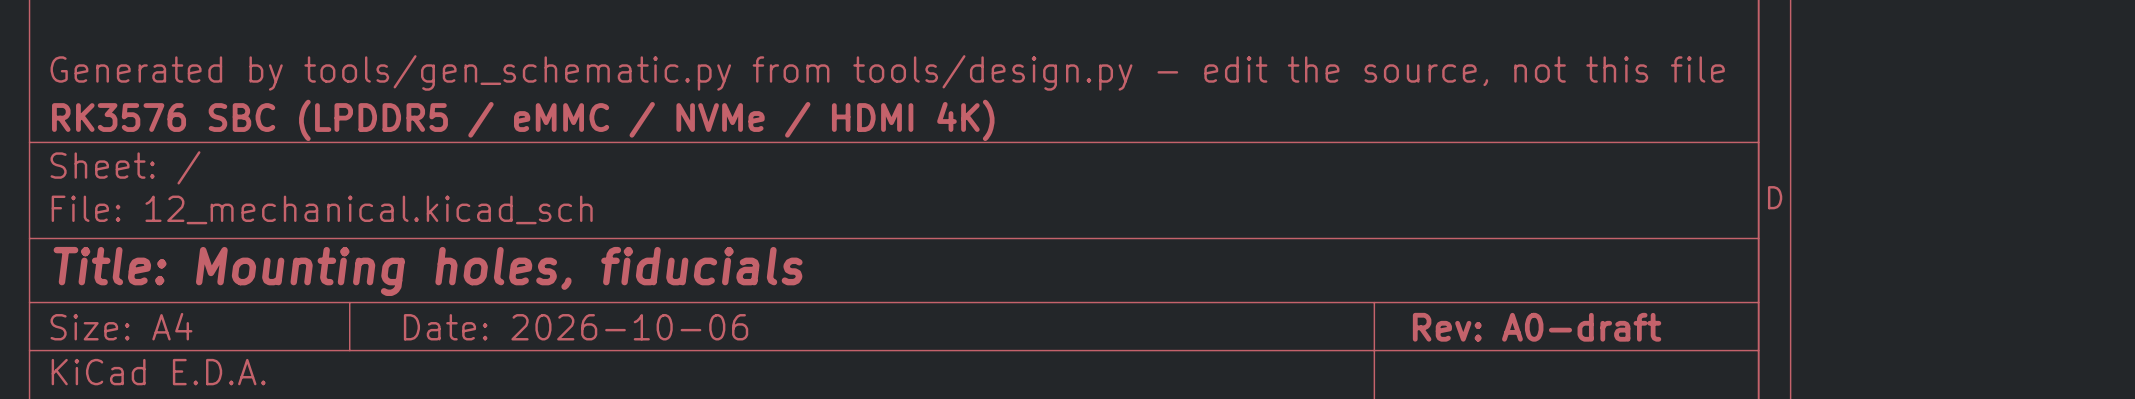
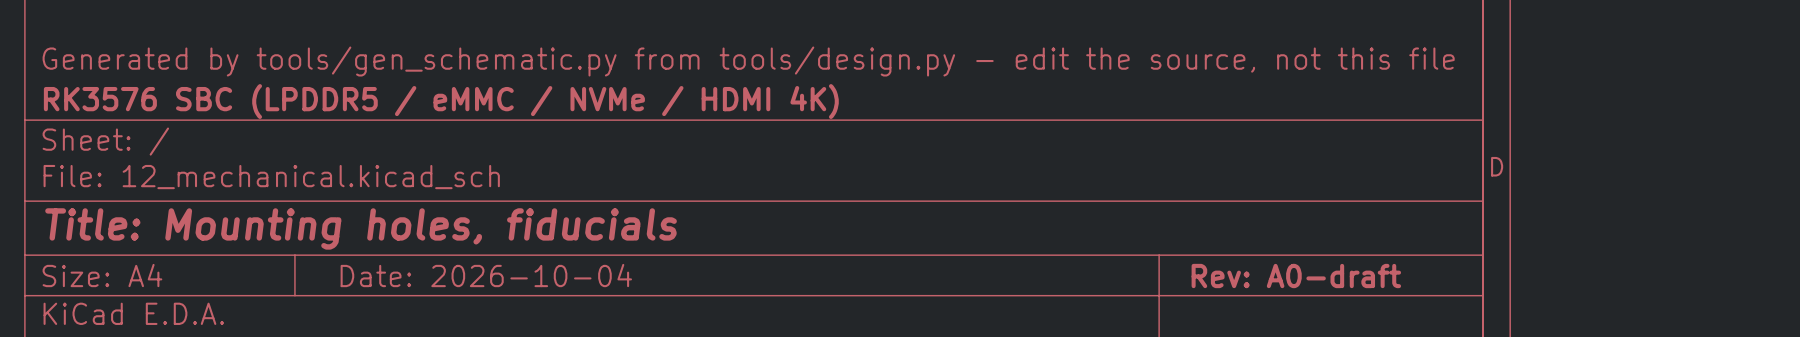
title block: Date: 2026-10-06 (576, 327) -> Date: 2026-10-04 (486, 275)

